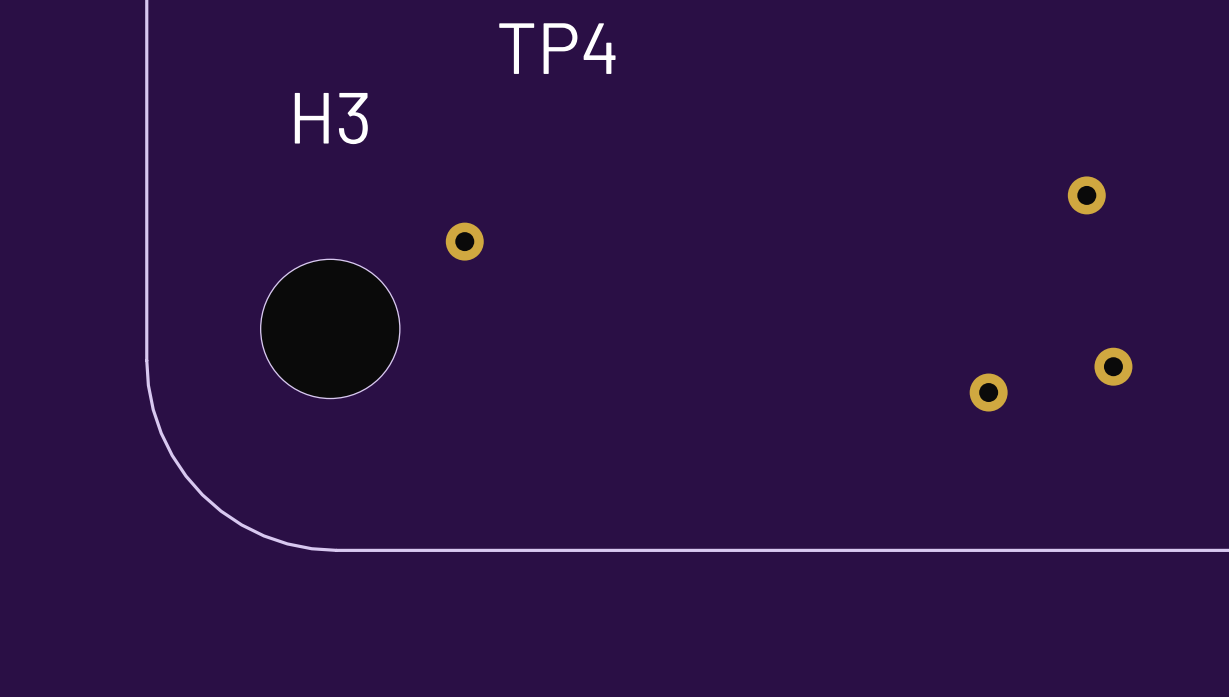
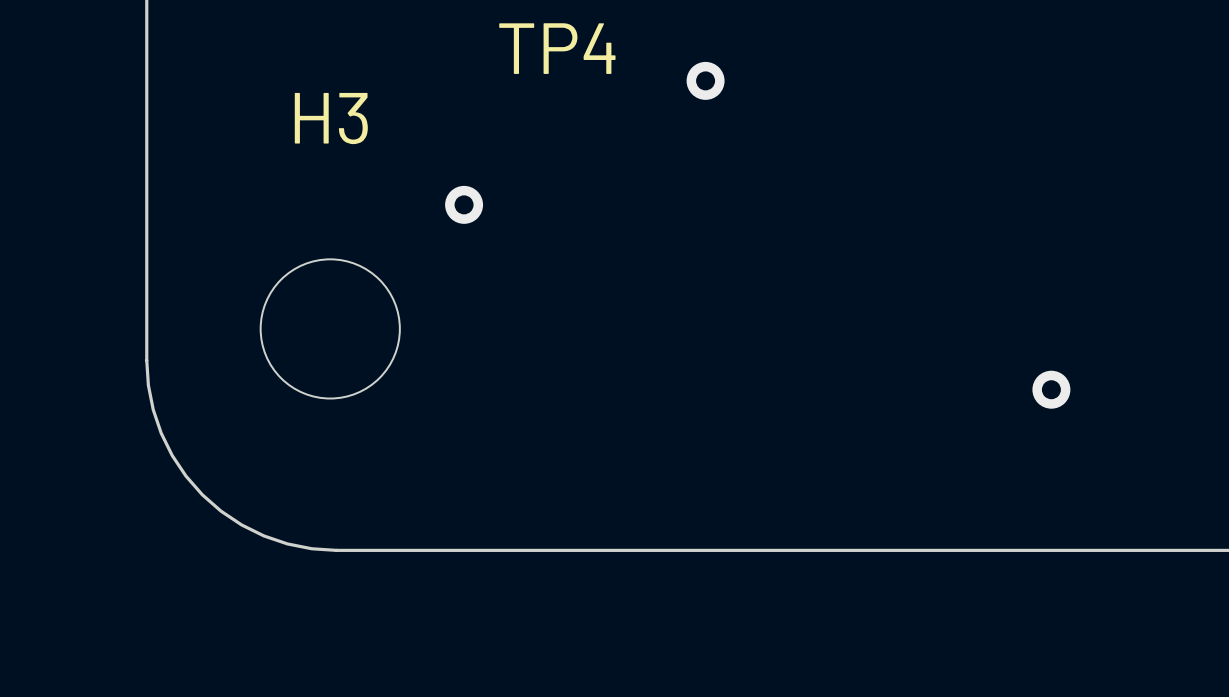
via: none -> (705, 80)
via: (1086, 195) -> none
via position: (464, 241) -> (464, 204)
via: (1113, 366) -> none
via: none -> (1051, 389)
via: (988, 392) -> none

